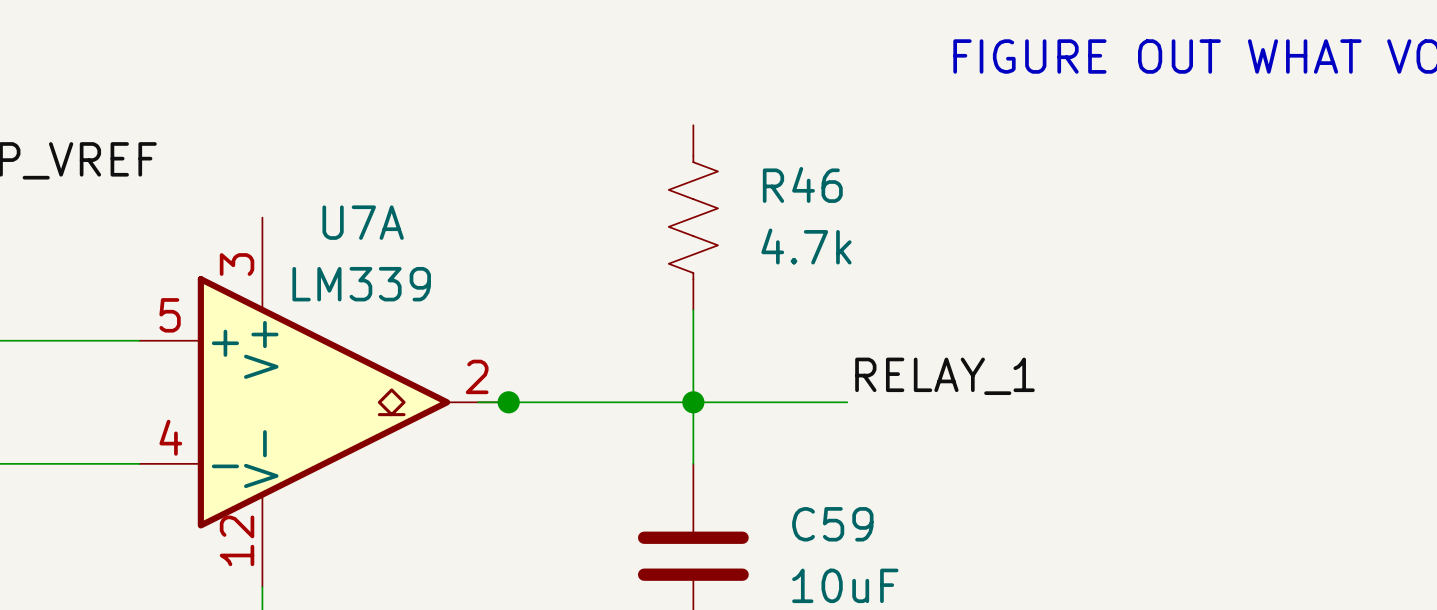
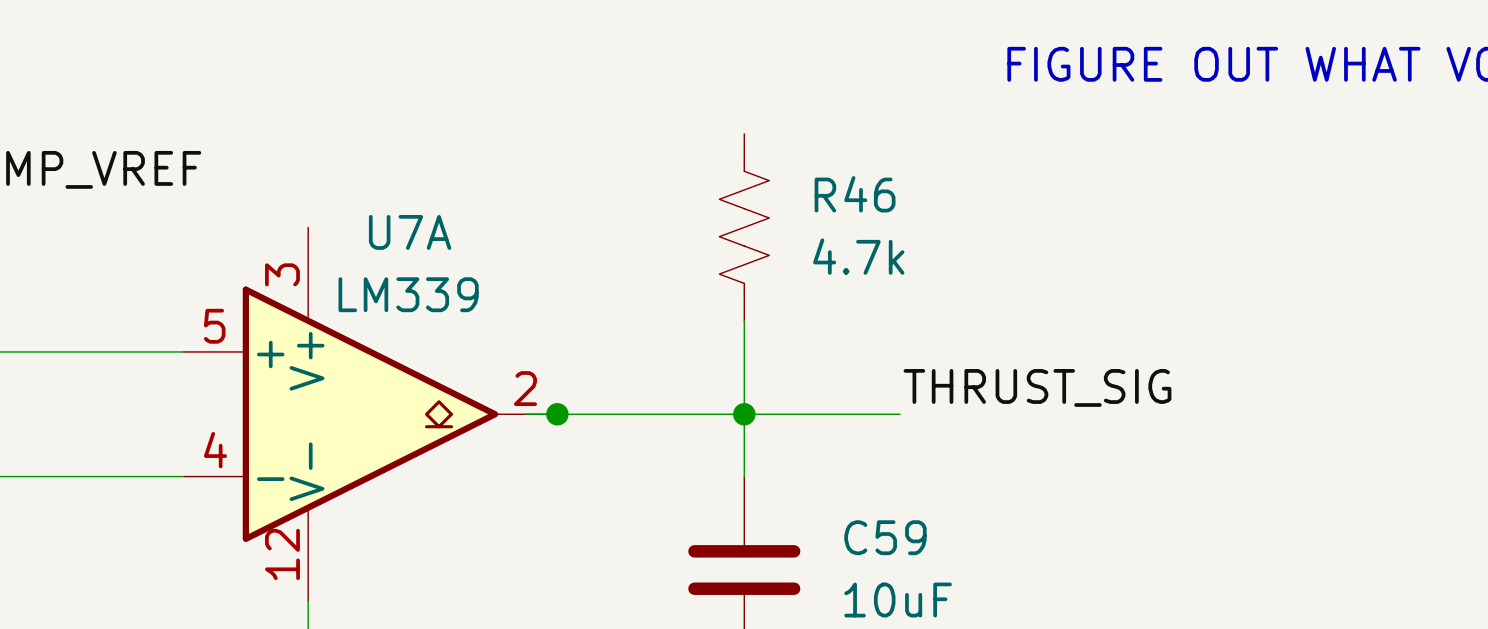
label: RELAY_1 (944, 376) -> THRUST_SIG (1037, 387)

